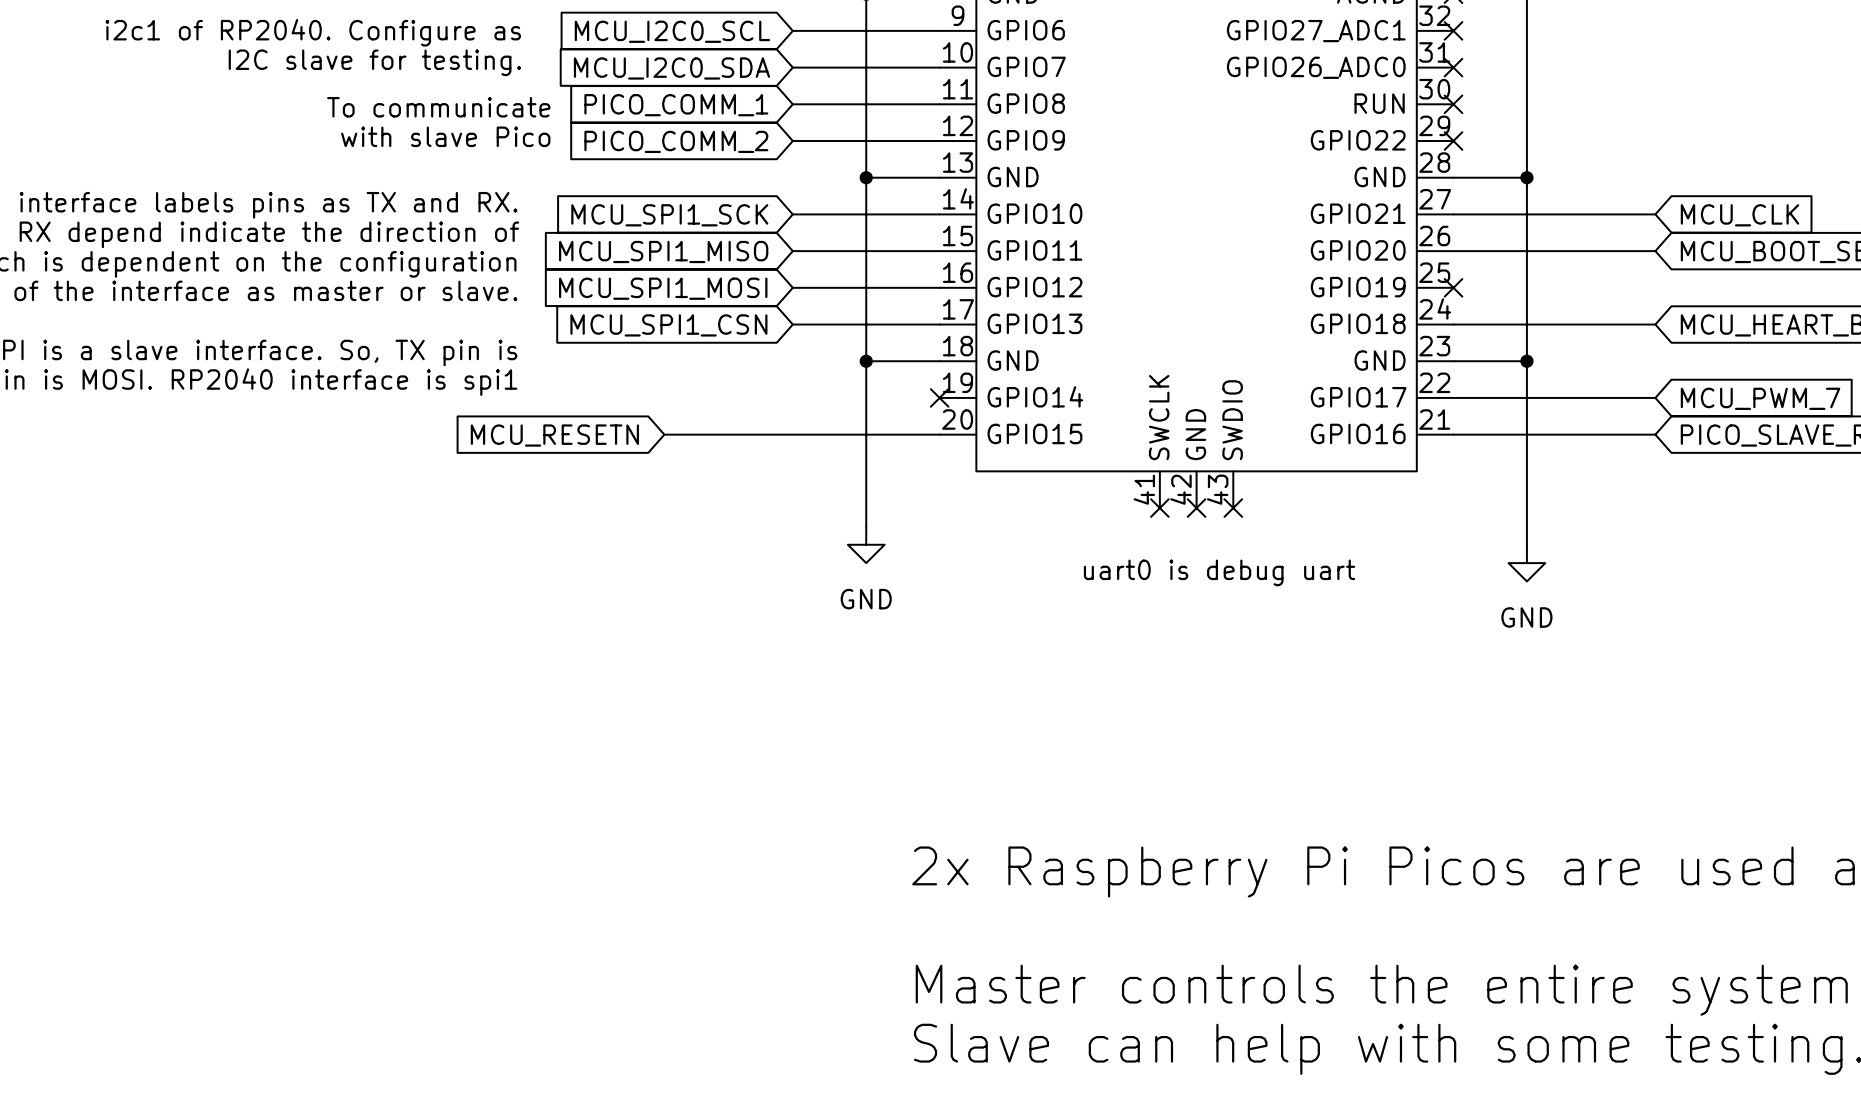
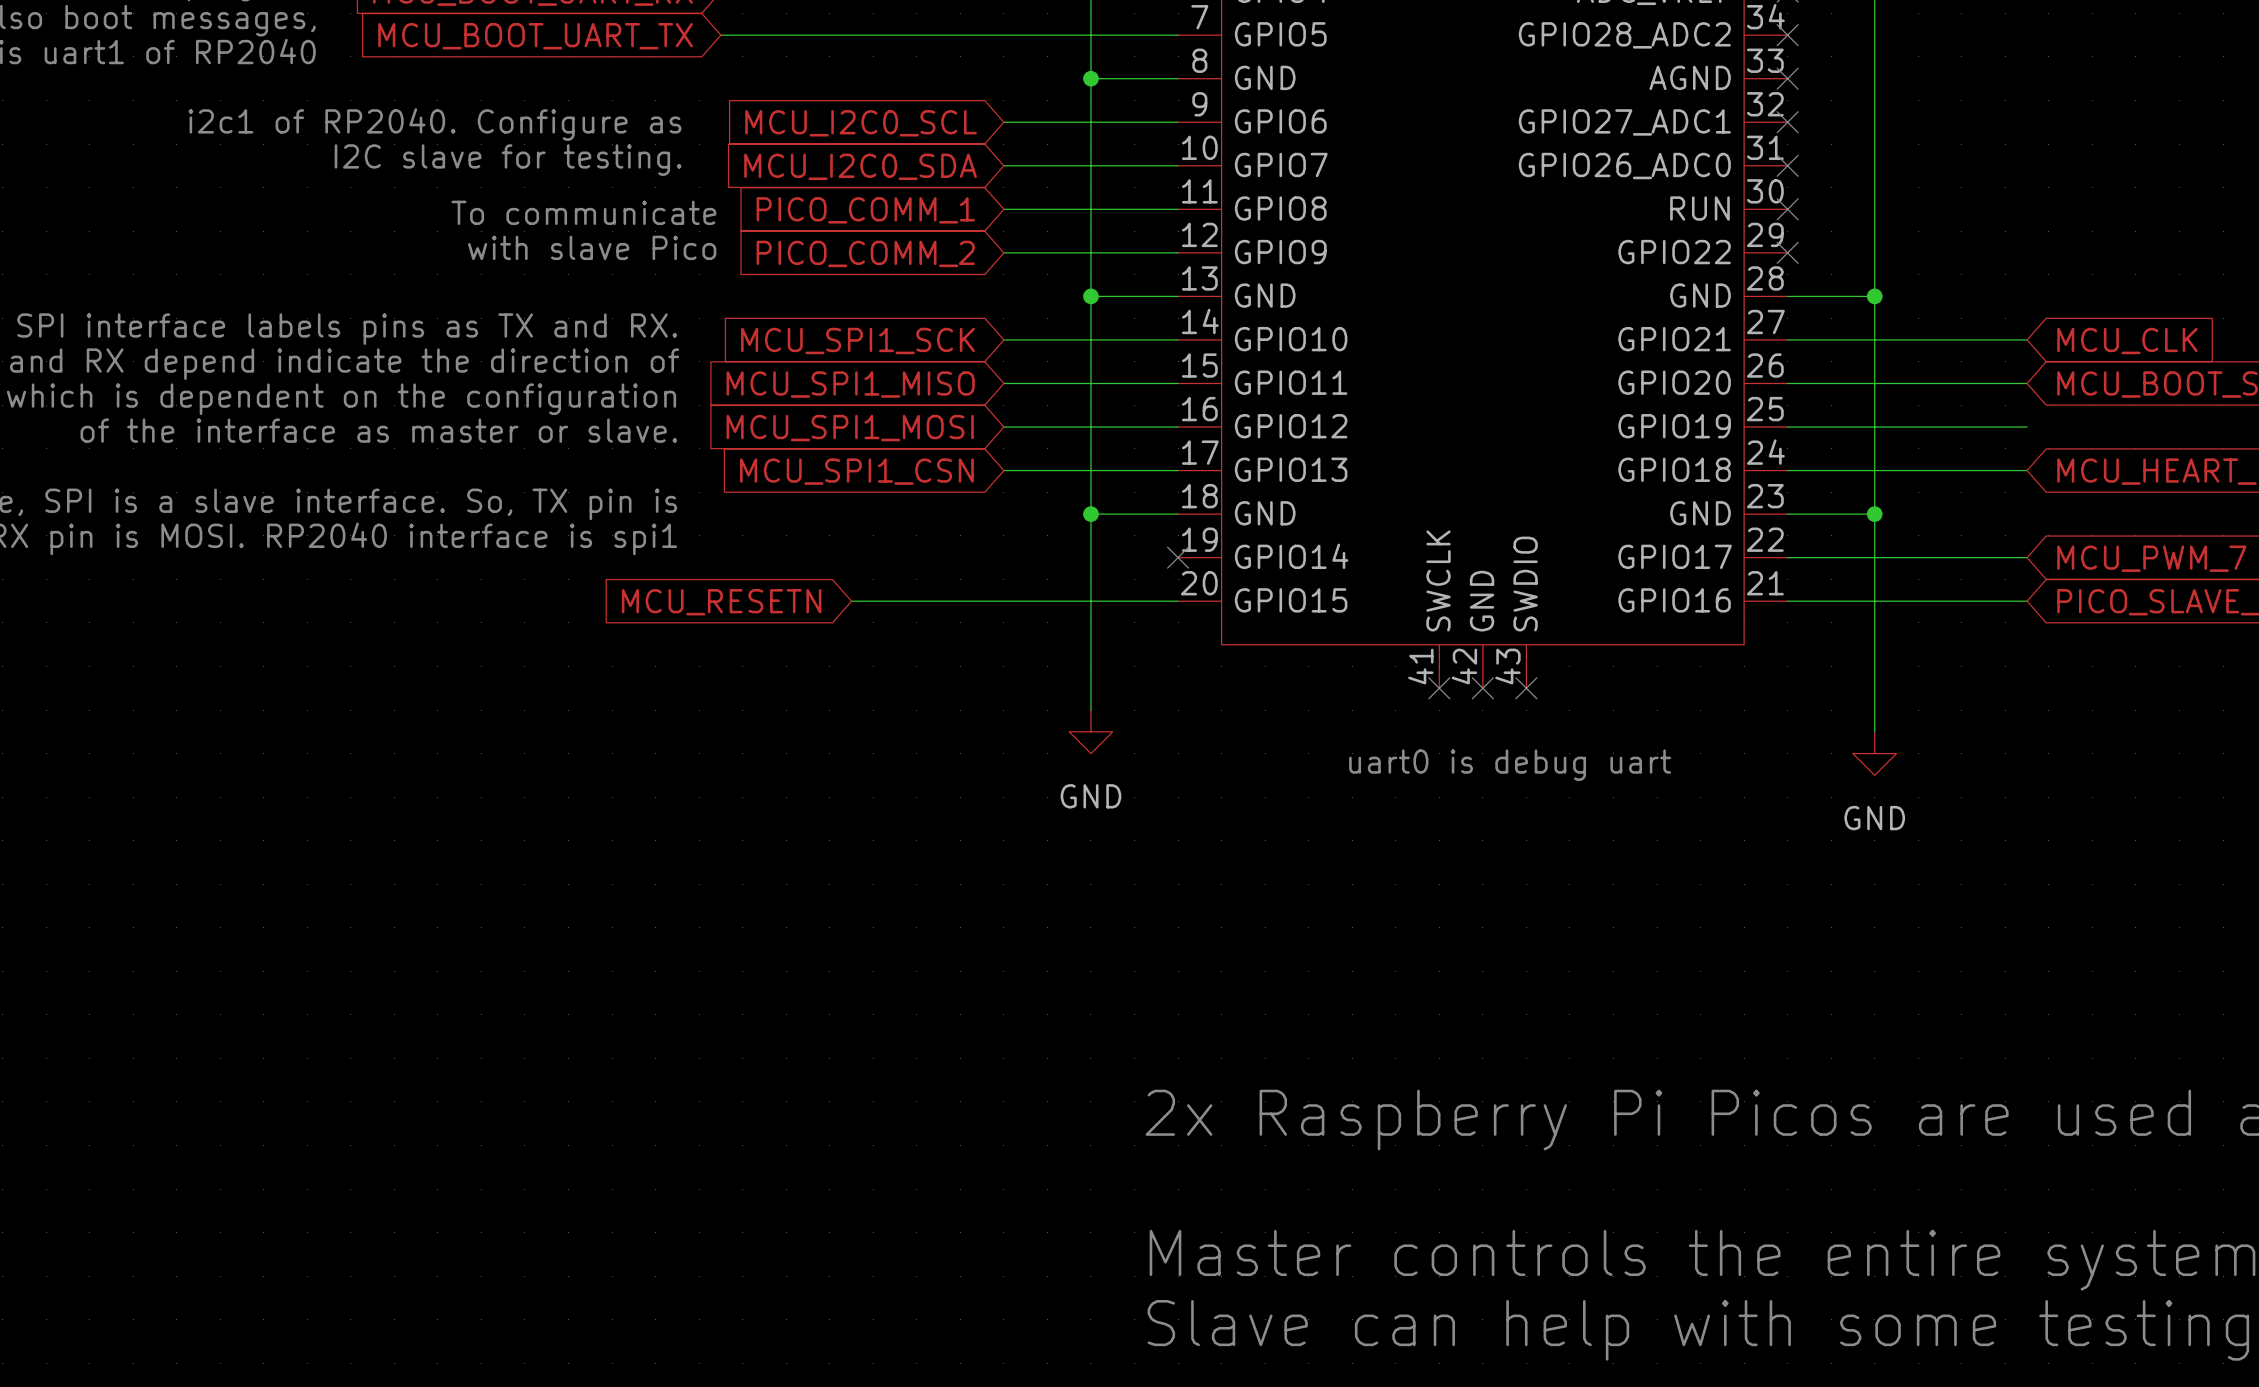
wire: none -> (1787, 427) (2027, 427)
no-connect mark: (1453, 287) -> none

